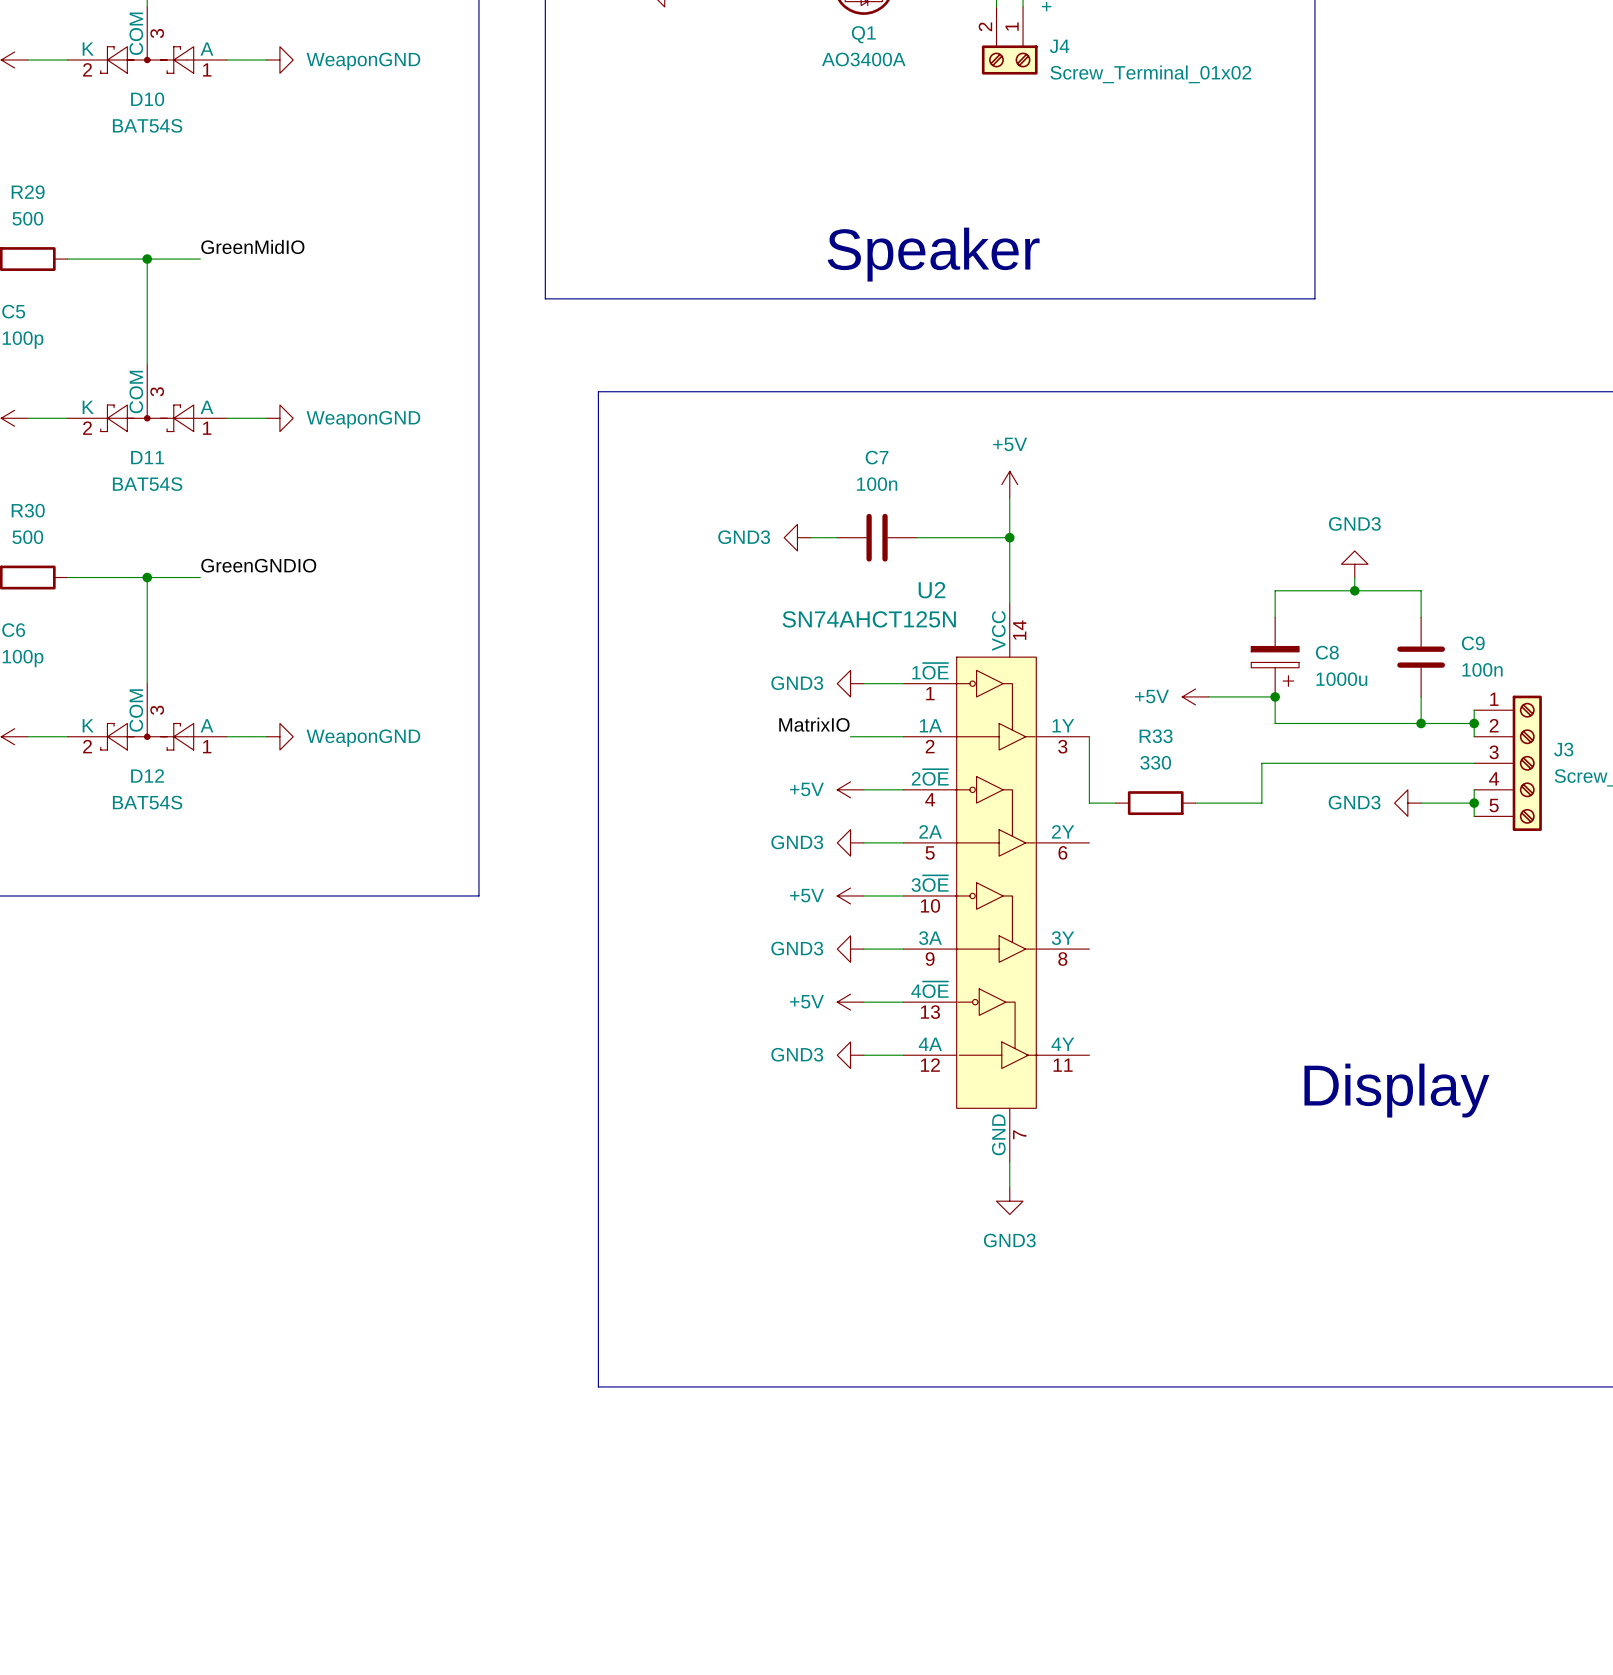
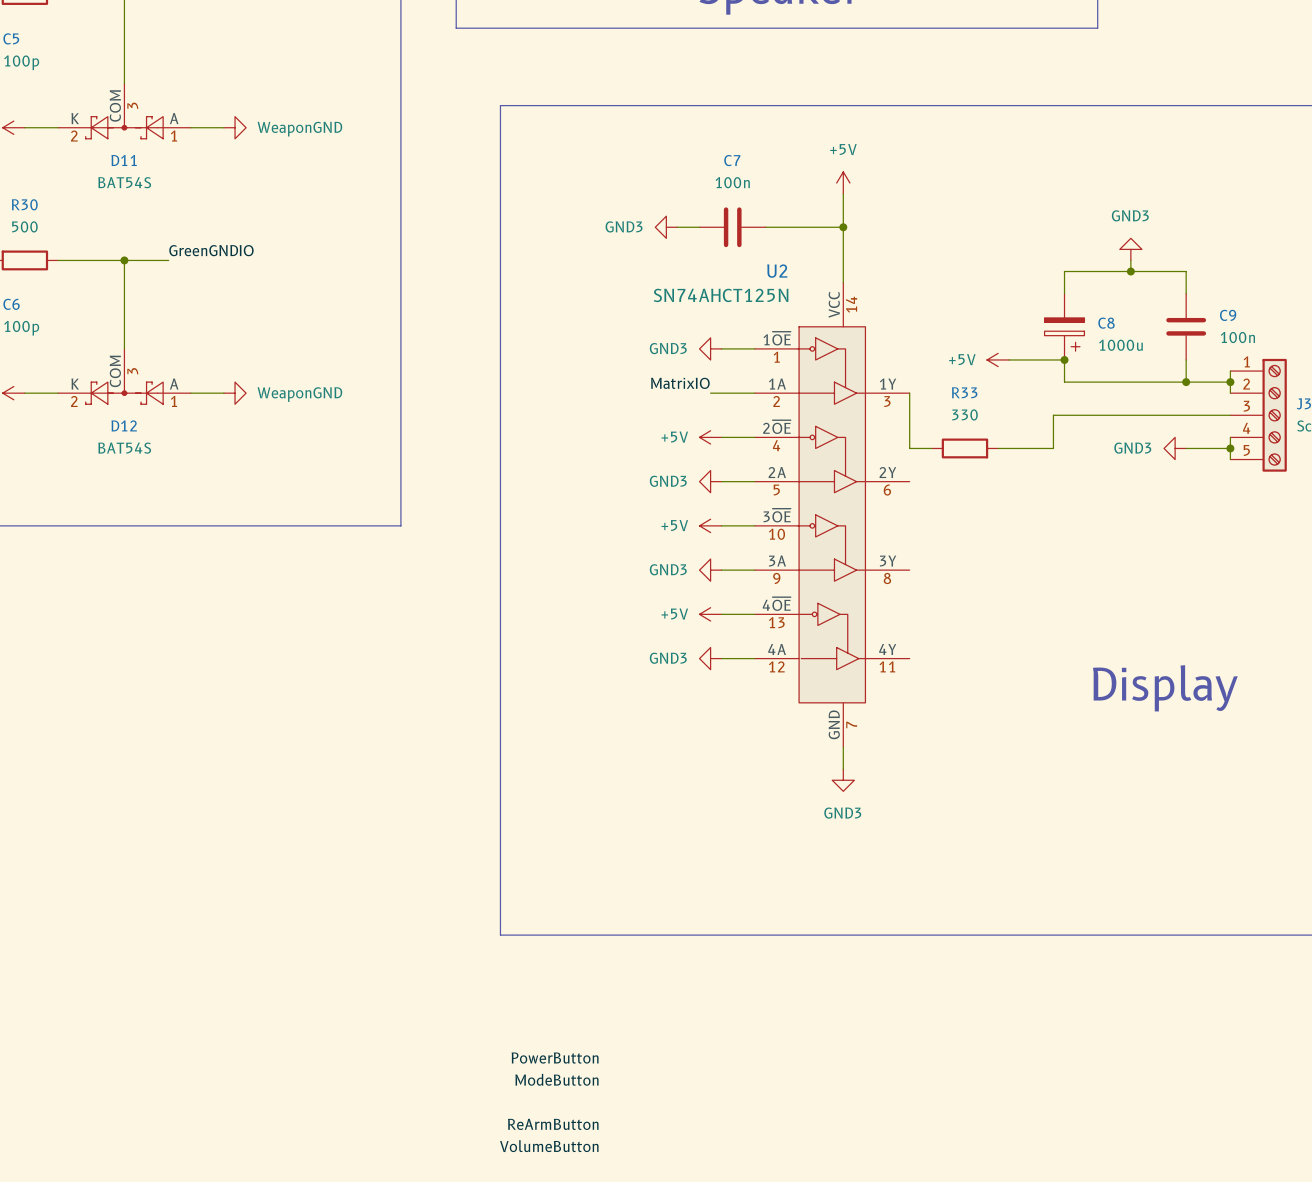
label: none -> PowerButton (555, 1058)
label: none -> ModeButton (556, 1079)
label: none -> ReArmButton (553, 1124)
label: none -> VolumeButton (549, 1146)

